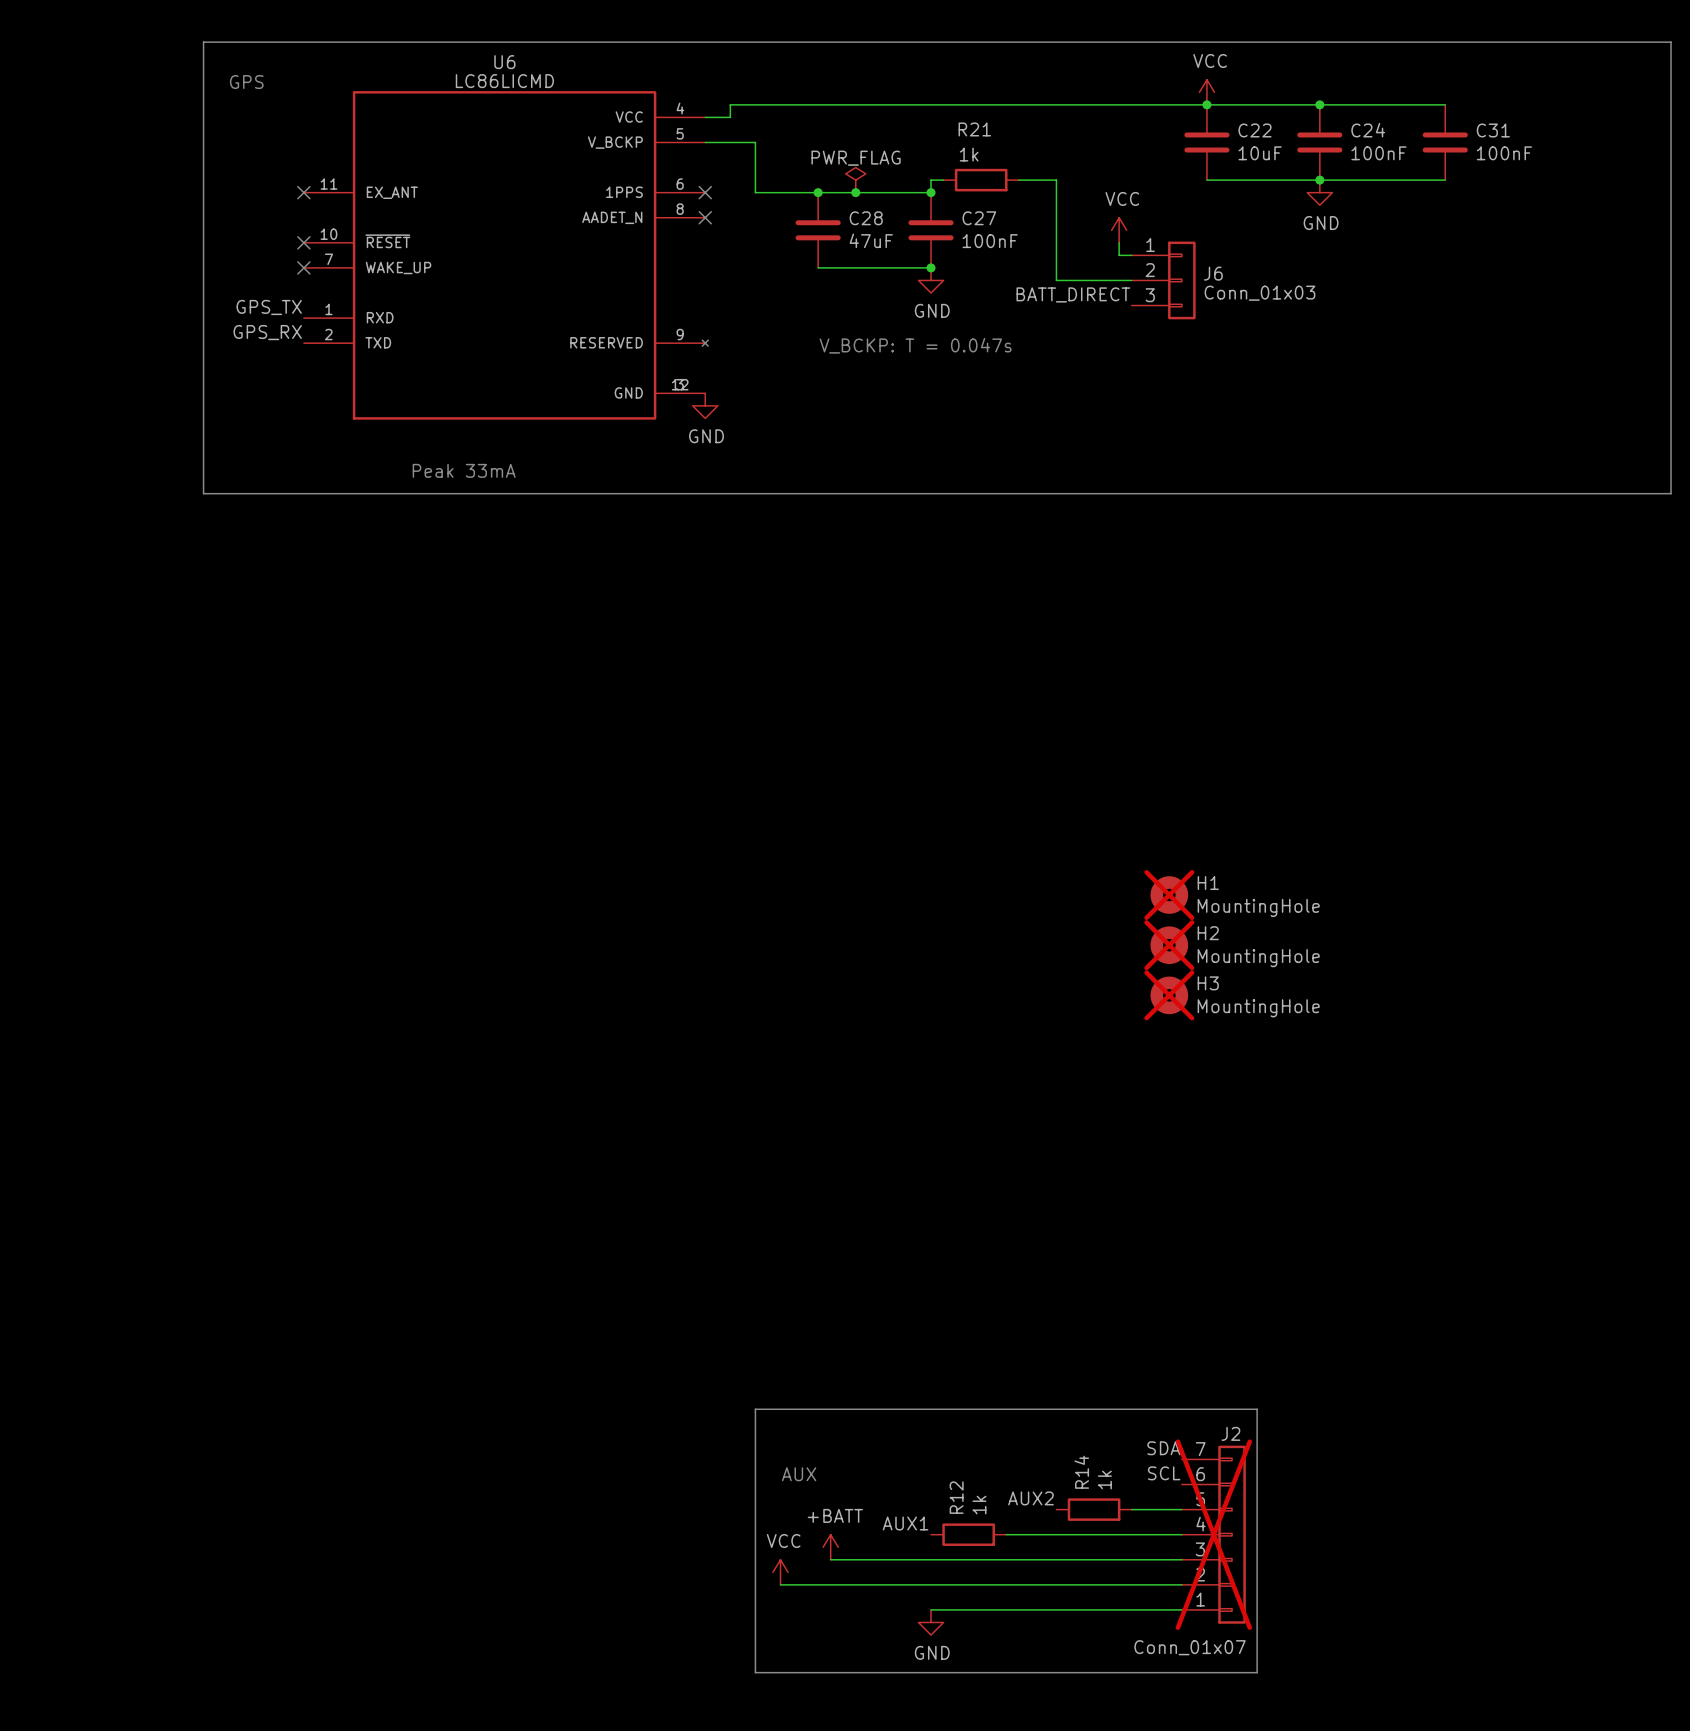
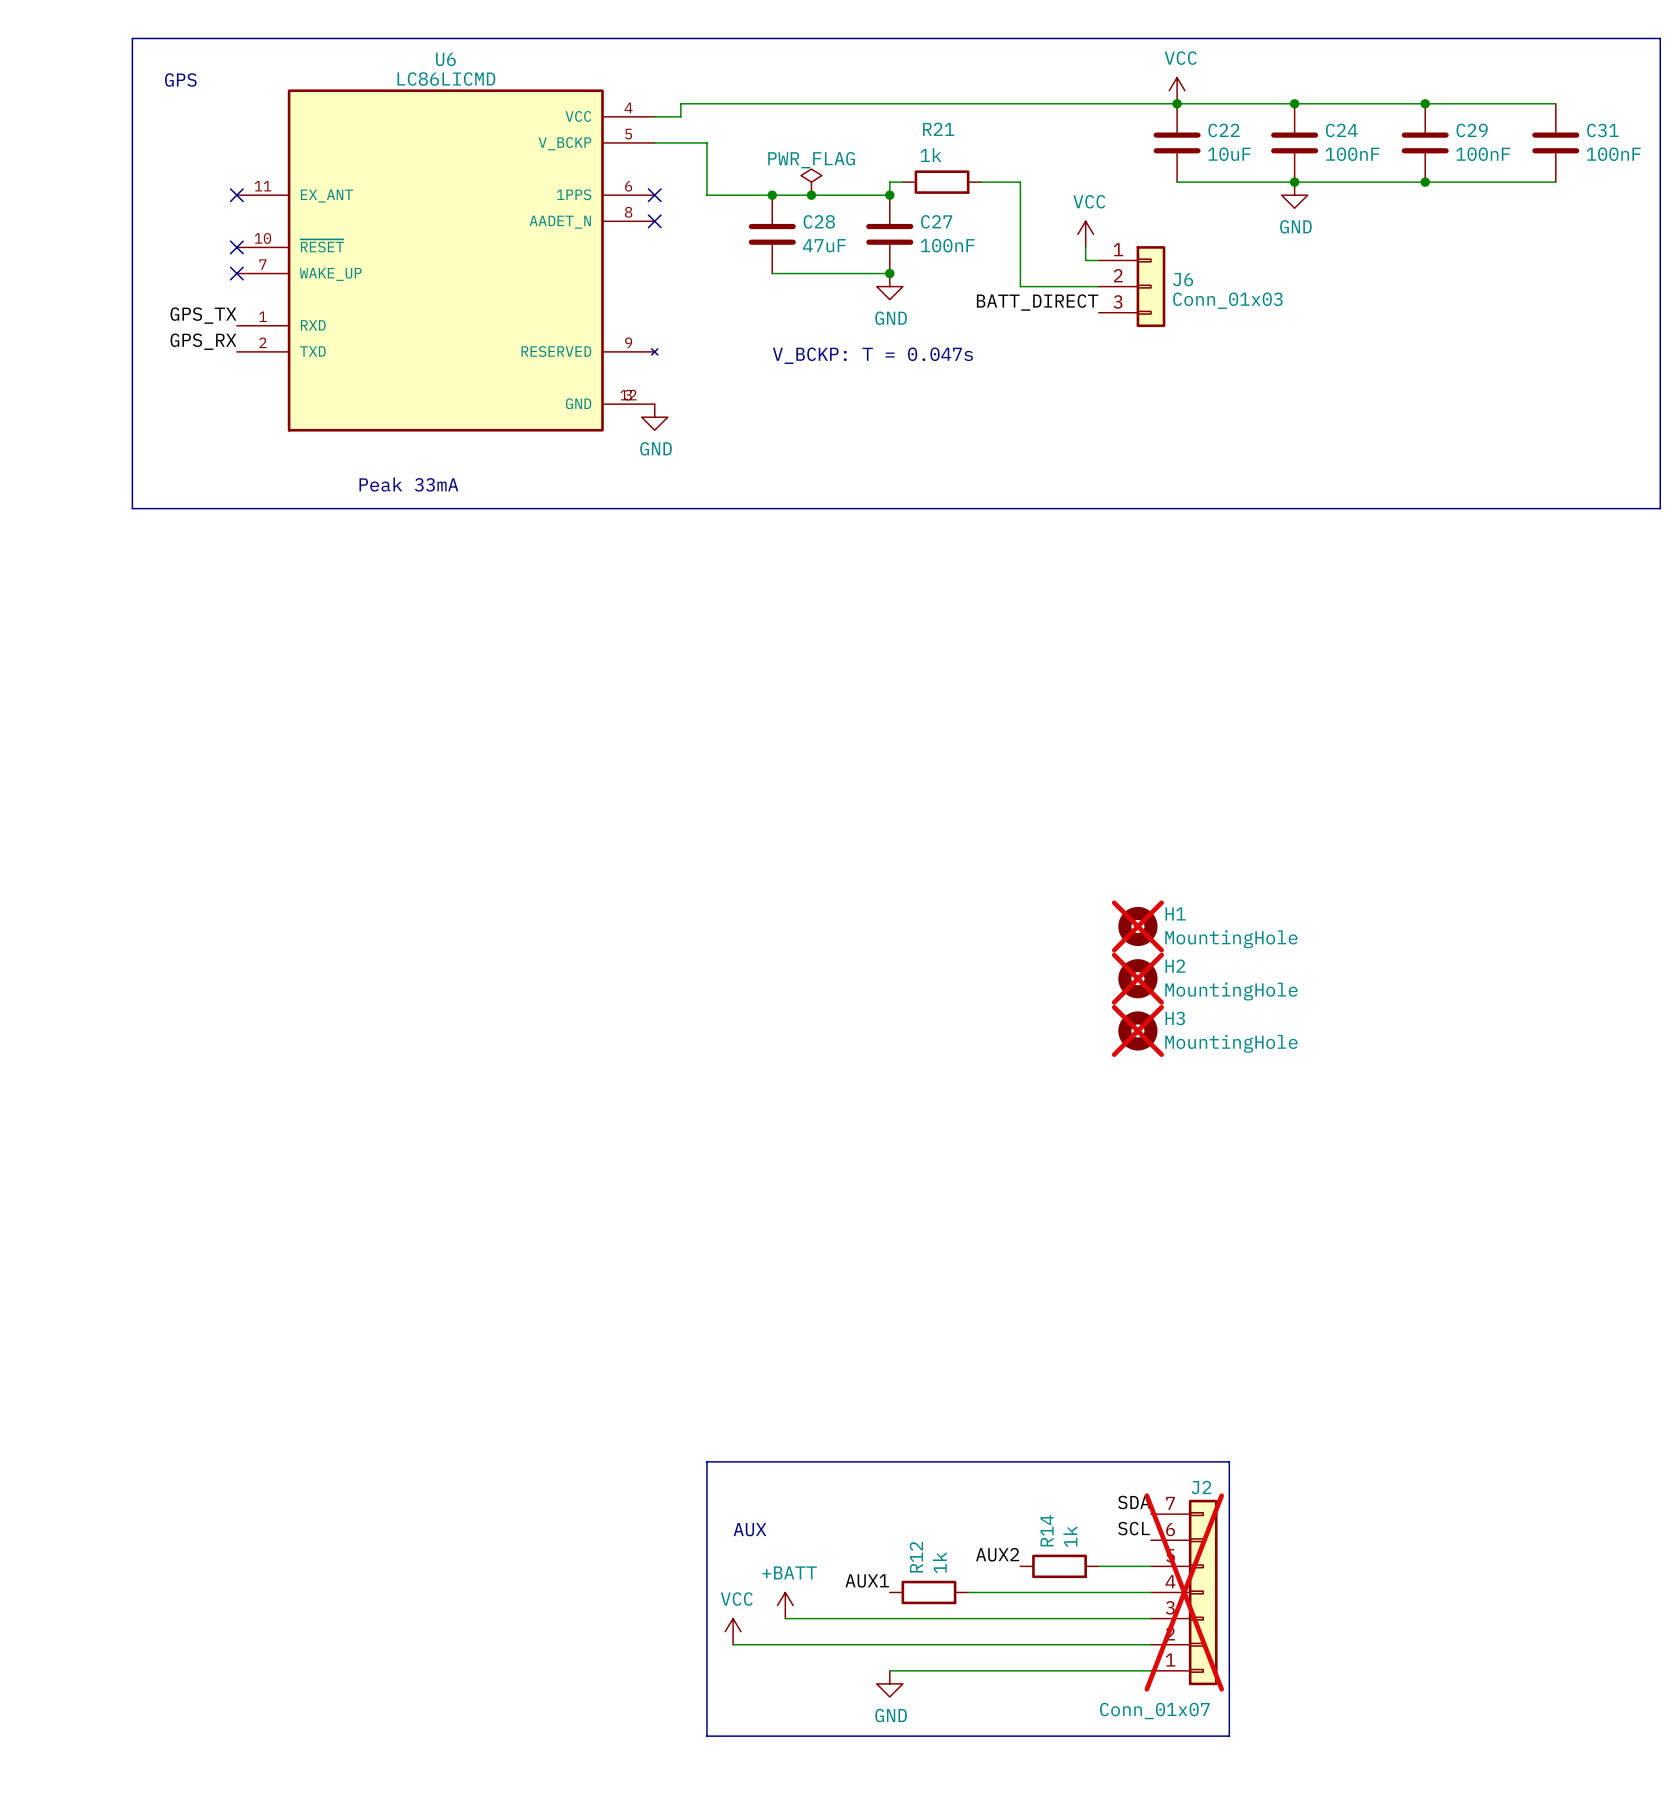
wire: none -> (1425, 103) (1555, 103)
junction: none -> (1425, 103)
C31 name: C31 (1493, 130) -> C29 (1472, 130)
C31: none -> 100nF (1555, 142)
wire: none -> (1425, 182) (1555, 182)
junction: none -> (1425, 182)

